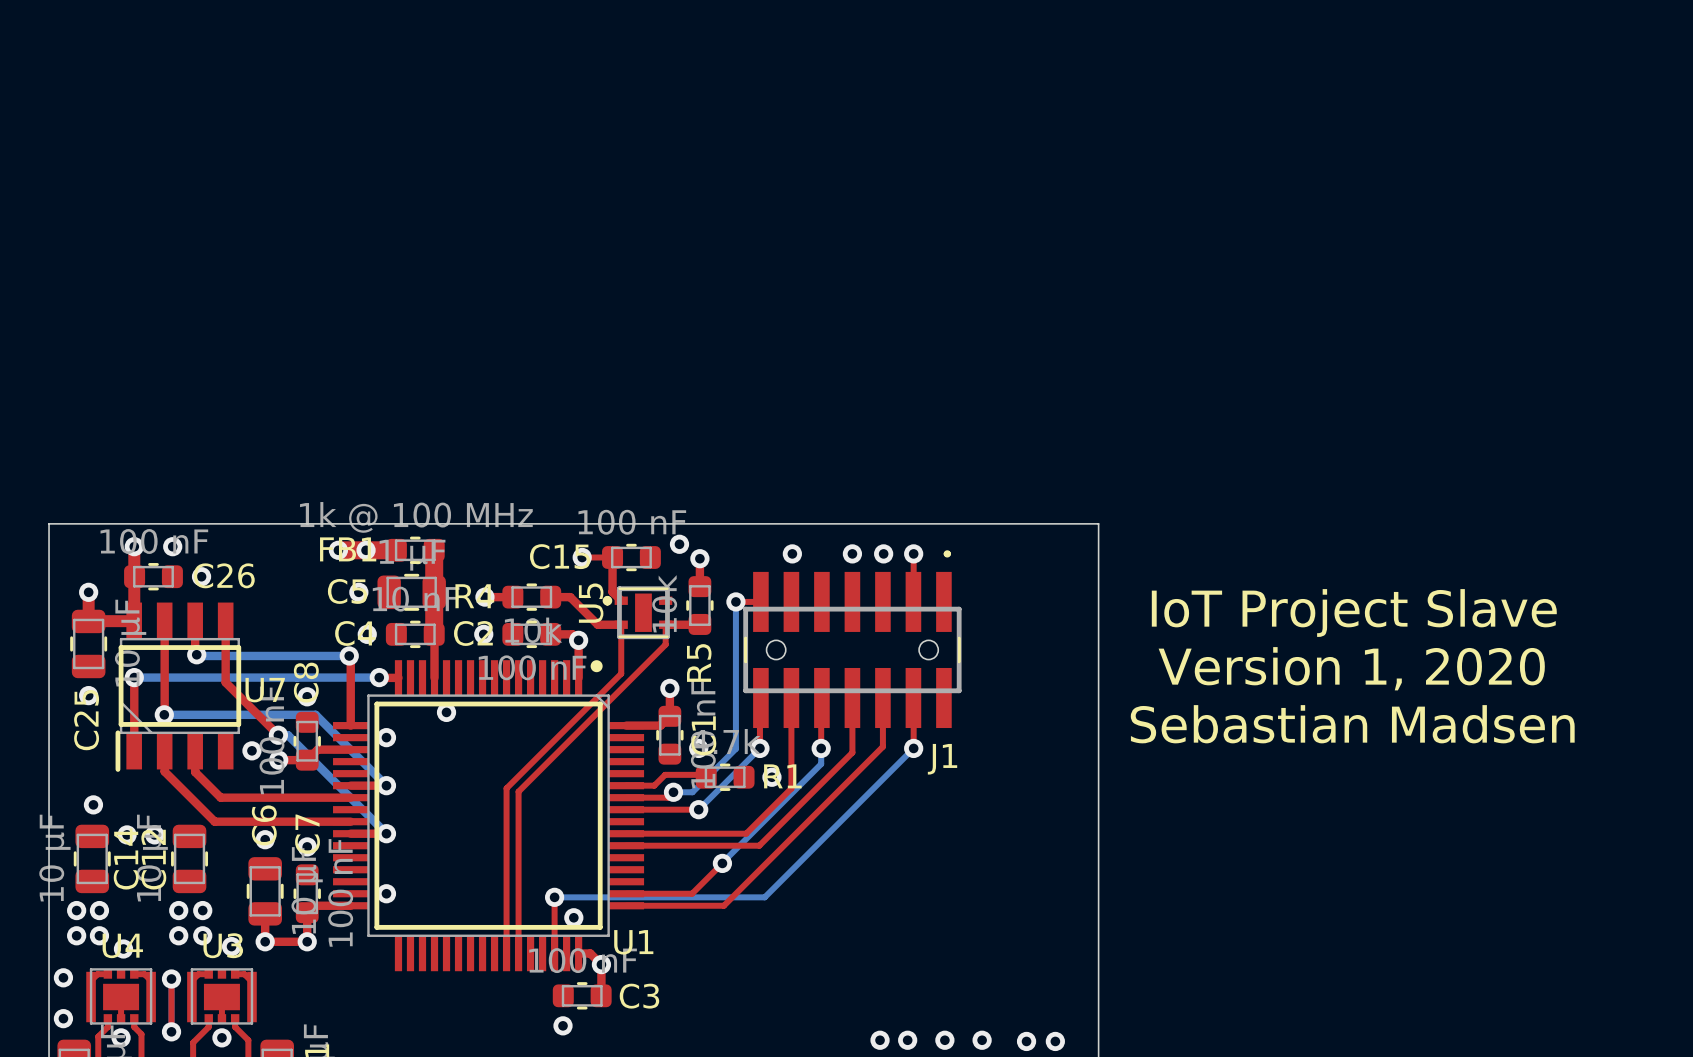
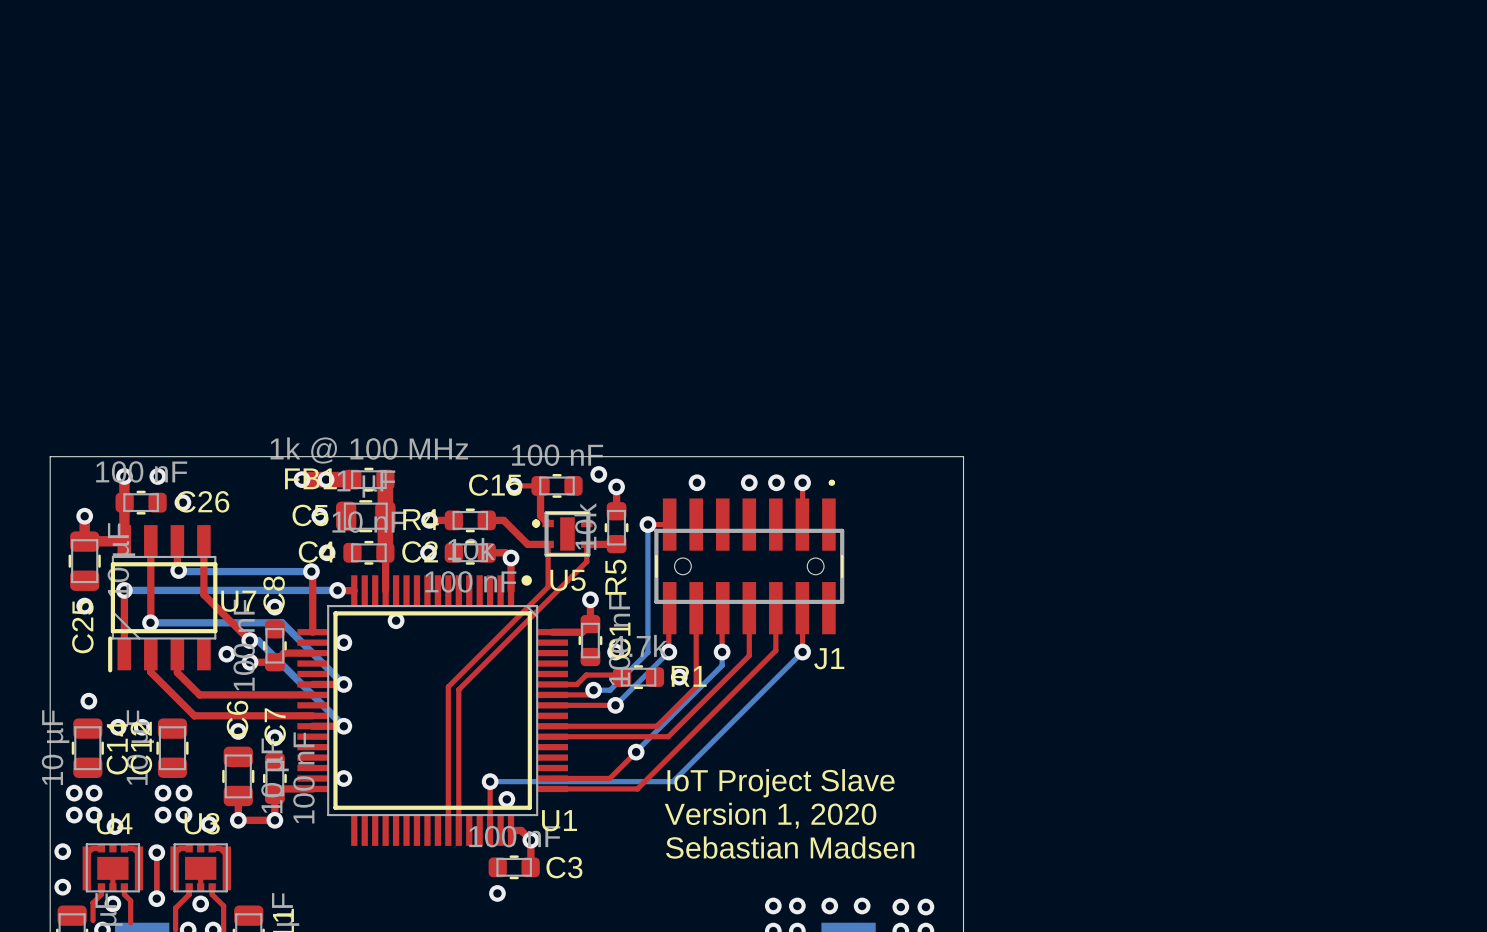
U5 name rotation: 0° (591, 603) -> 90° clockwise (568, 580)
U5 name position: U5 (591, 603) -> U5 (568, 580)
text: IoT Project Slave (1354, 613) -> none
text: Version 1, 2020 (1351, 668) -> none
text: Sebastian Madsen (1352, 724) -> none
text: none -> IoT Project Slave (781, 783)
text: none -> Version 1, 2020 (770, 815)
text: none -> Sebastian Madsen (790, 847)

